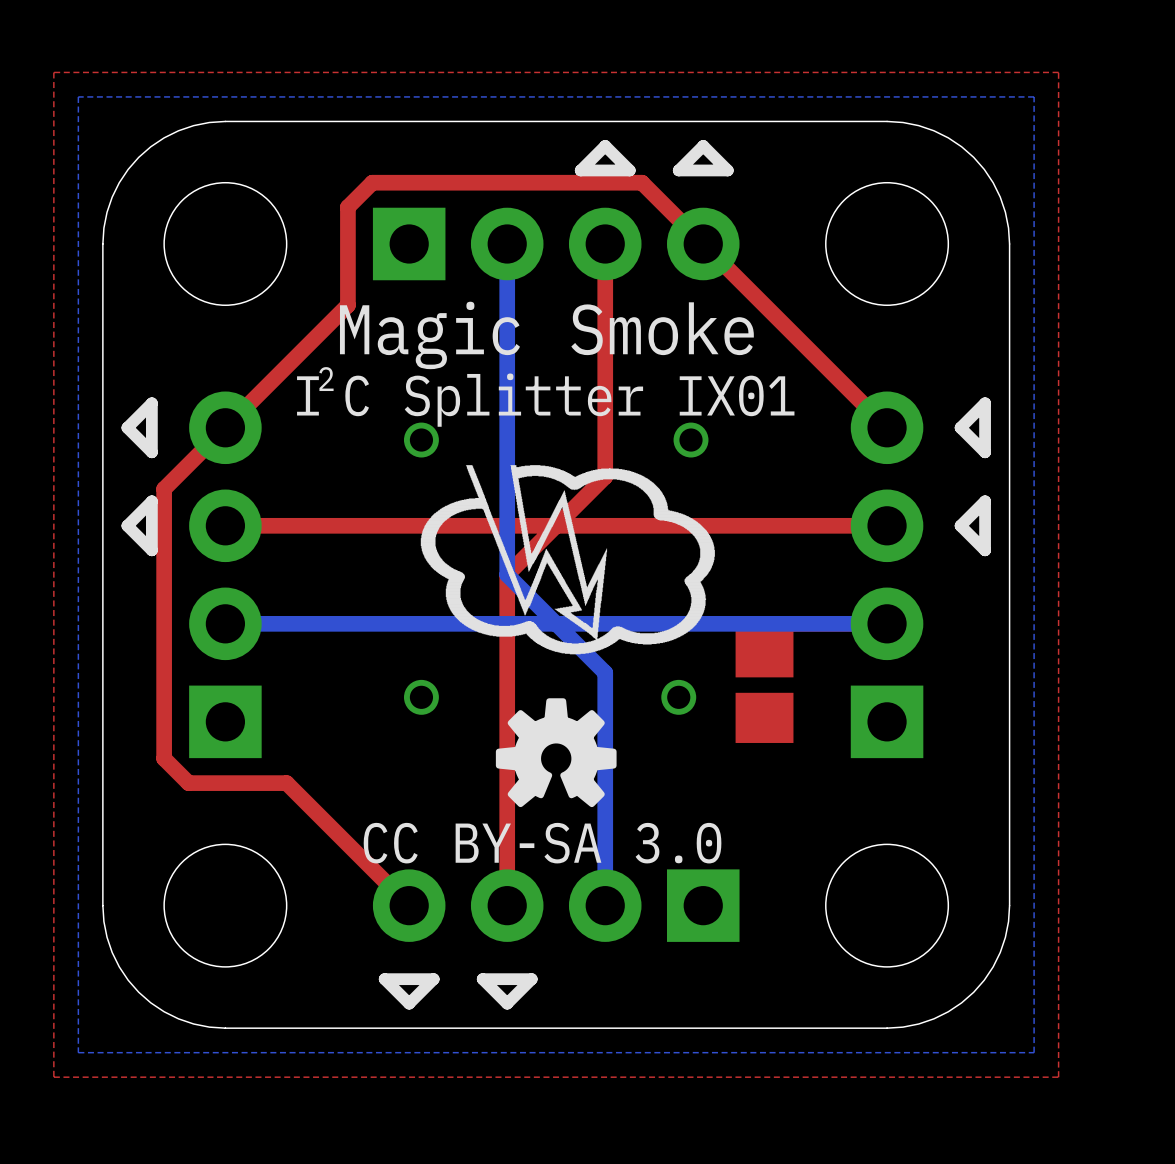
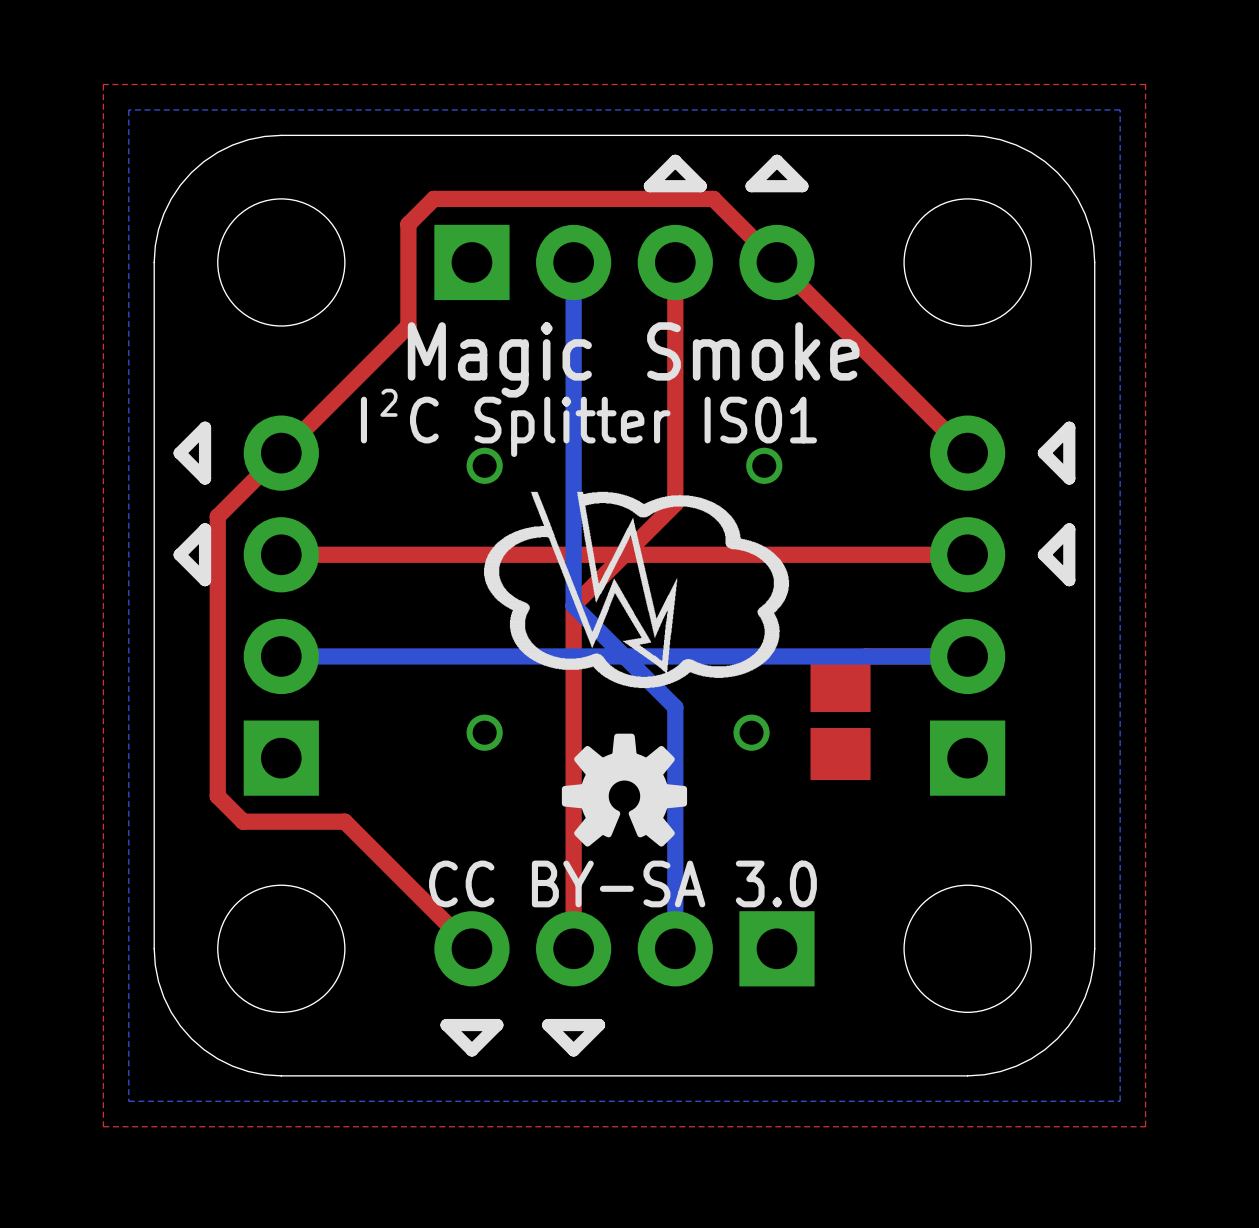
text: C Splitter IX01 (569, 400) -> C Splitter IS01 (613, 426)

